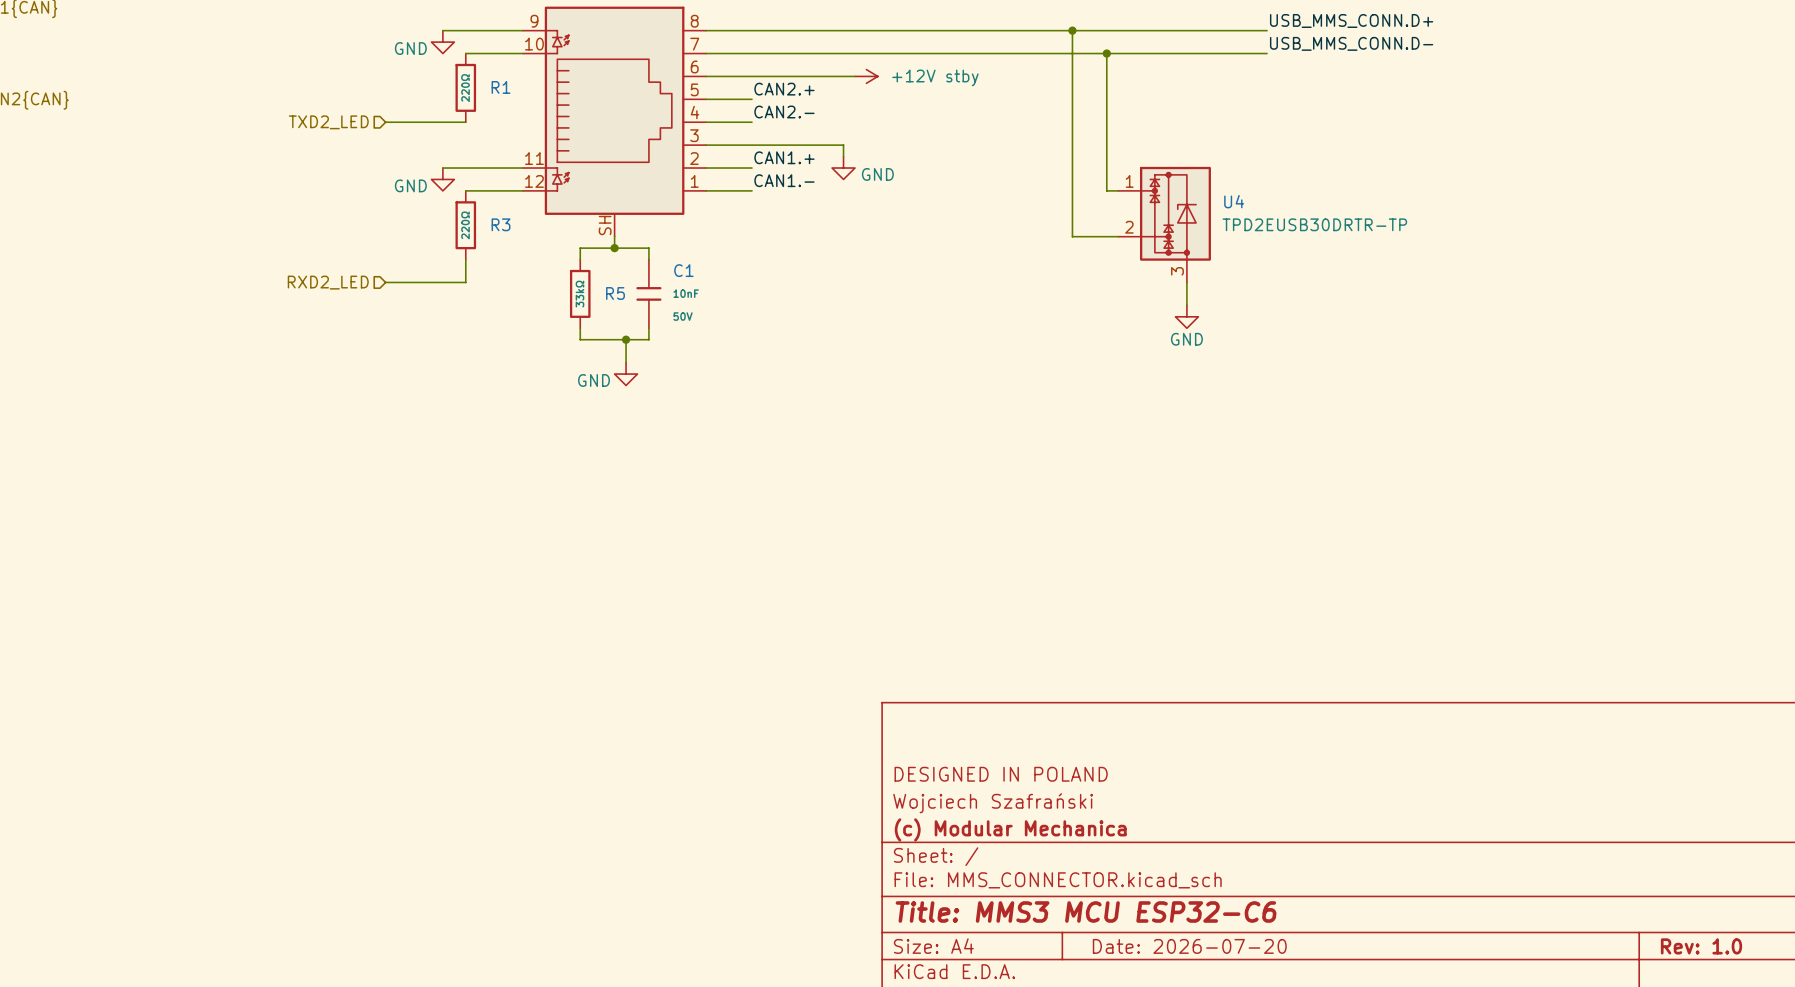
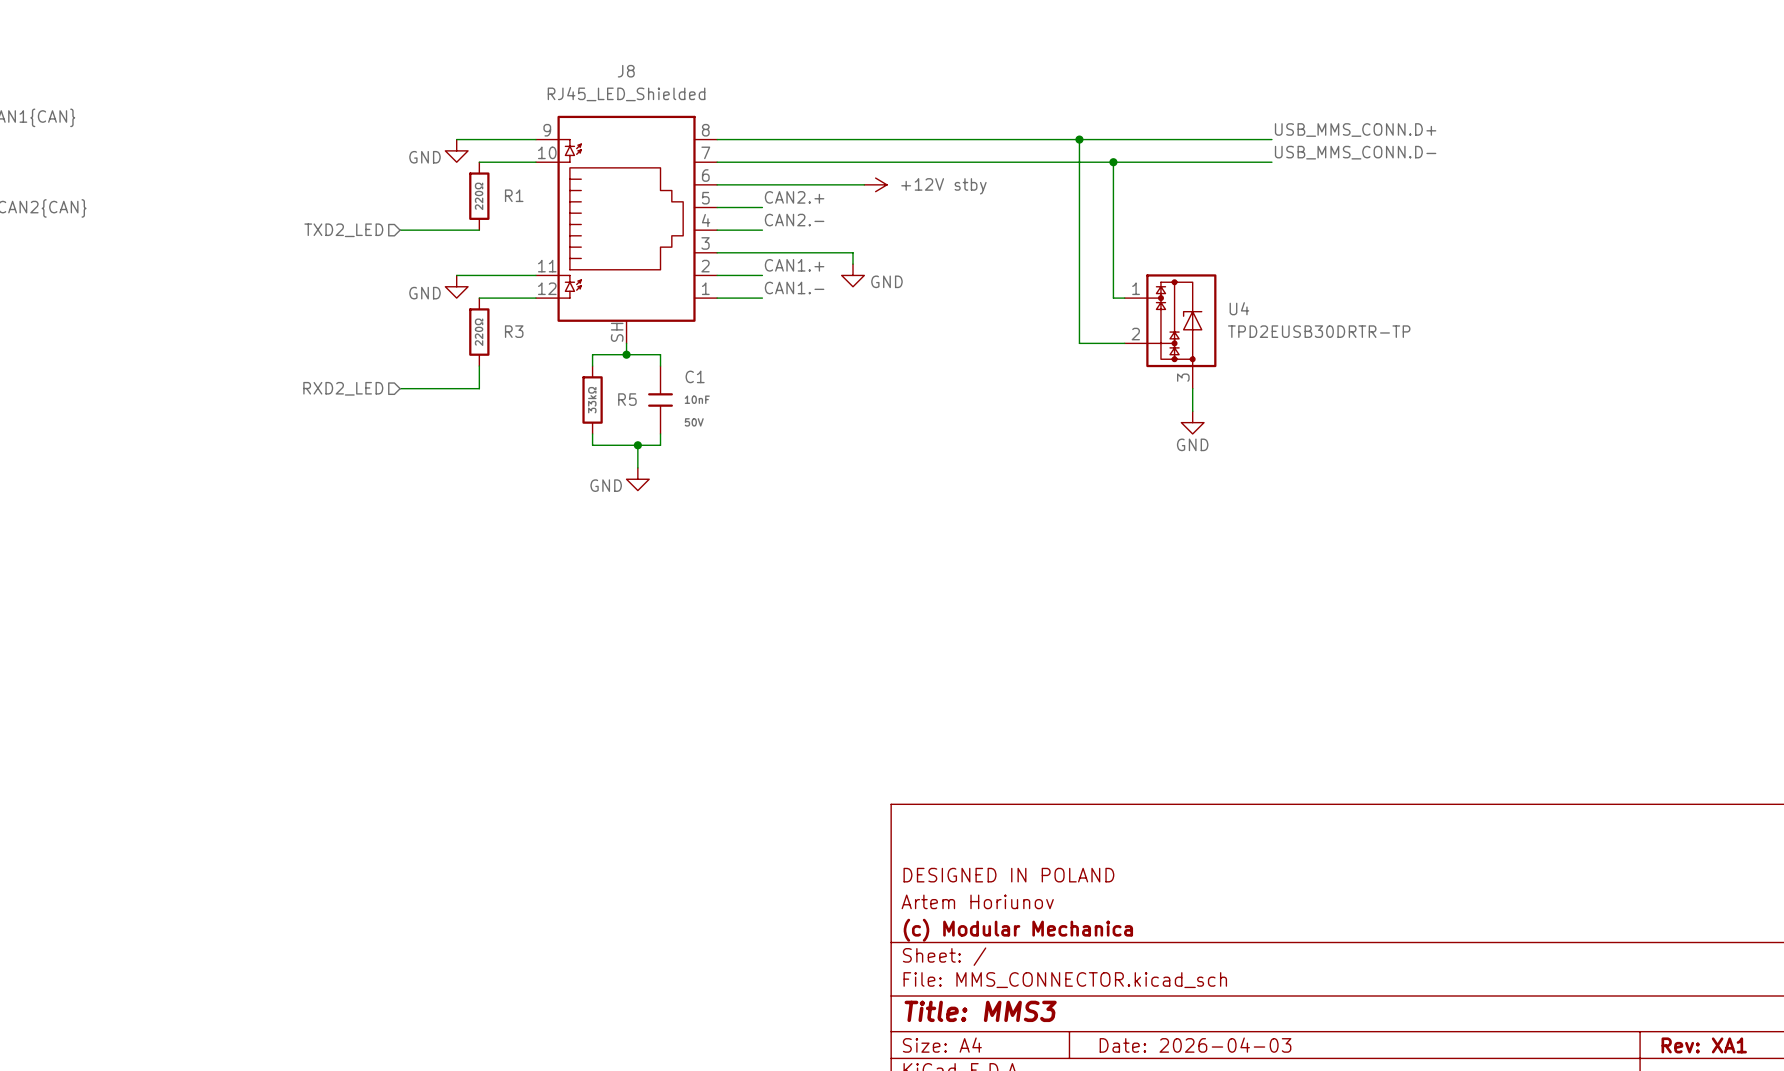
title block: Wojciech Szafrański (993, 803) -> Artem Horiunov (977, 901)
title block: Title: MMS3 MCU ESP32-C6 (1086, 911) -> Title: MMS3 (980, 1011)
title block: Date: 2026-07-20 (1189, 946) -> Date: 2026-04-03 (1195, 1045)
title block: Rev: 1.0 (1701, 946) -> Rev: XA1 (1704, 1045)

